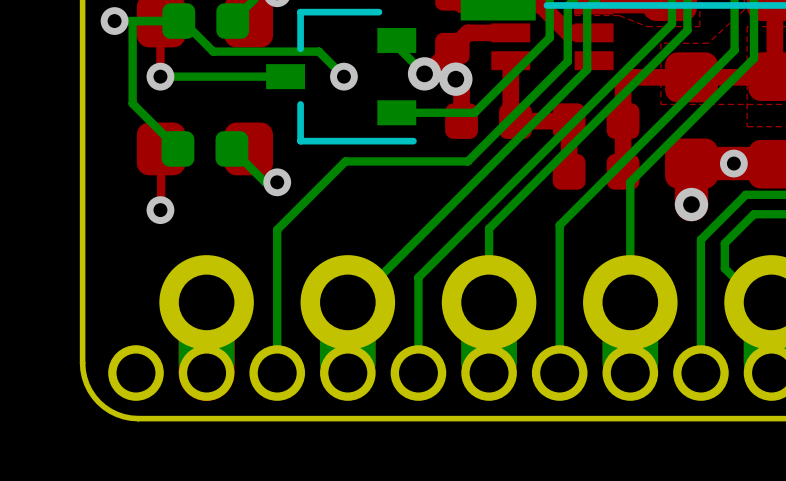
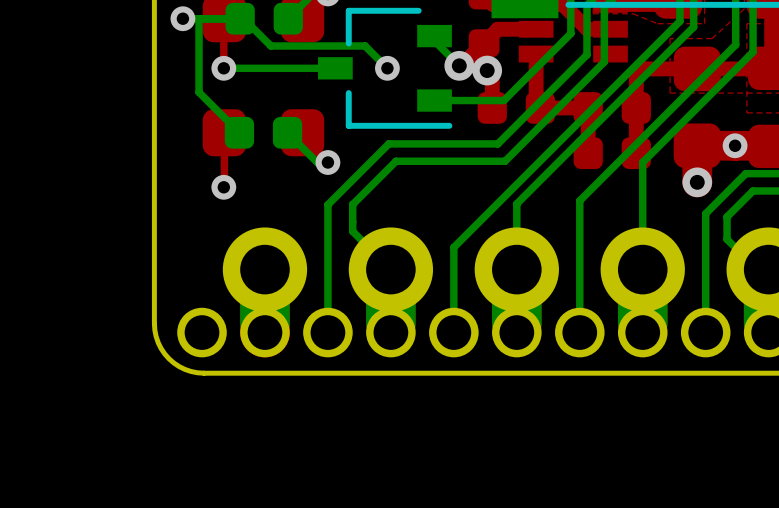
bottom track: (475, 180) (354, 302) (347, 302) -> (505, 161) (395, 161) (352, 204) (352, 231) (390, 269)

